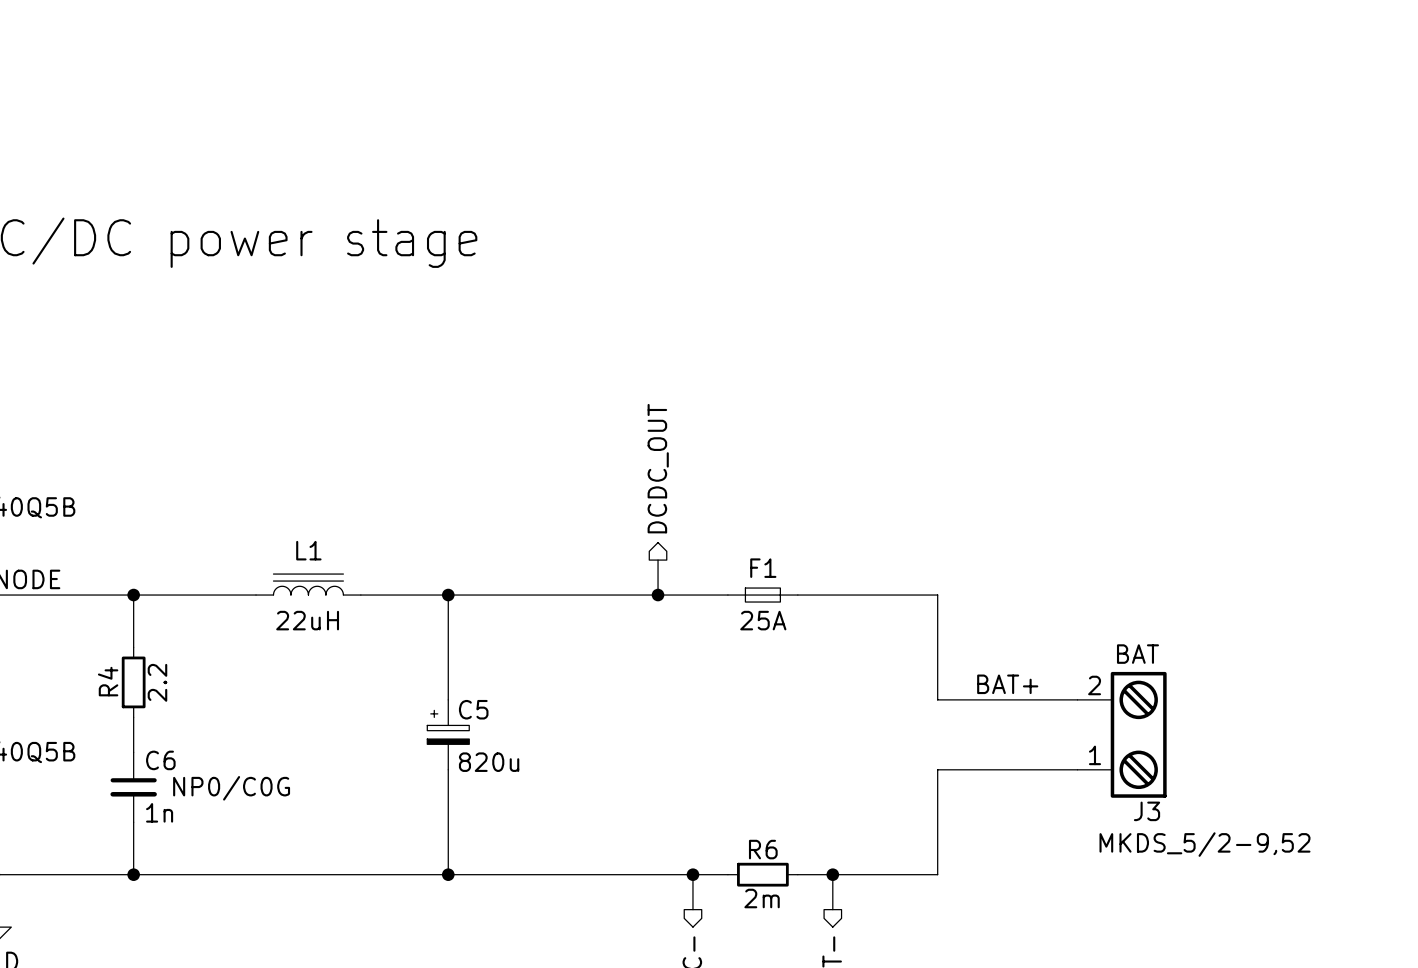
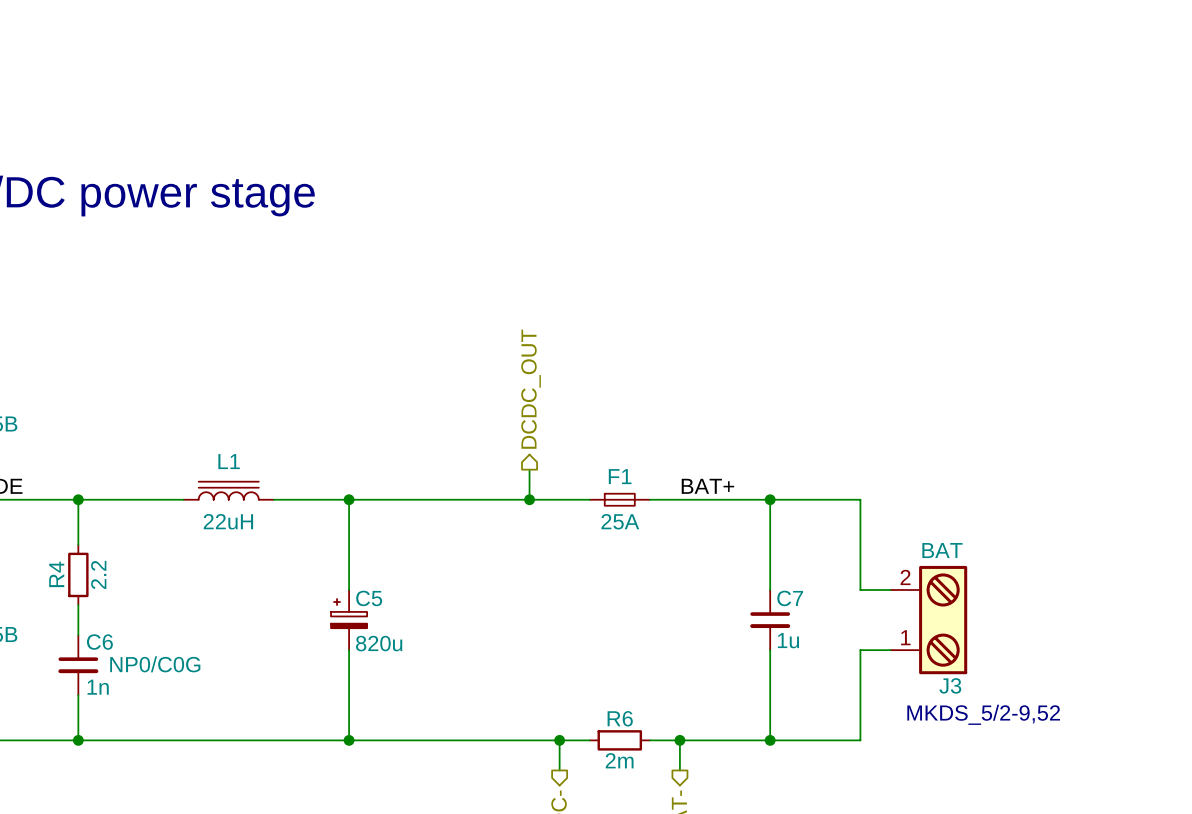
junction: none -> (770, 499)
label position: BAT+ (1007, 684) -> BAT+ (707, 486)
wire: (937, 699) (1042, 699) -> (770, 499) (860, 499) (860, 589)
C7: none -> 1u (770, 620)
wire: (937, 769) (1042, 769) -> (770, 740) (860, 740) (860, 650)
junction: none -> (770, 740)

